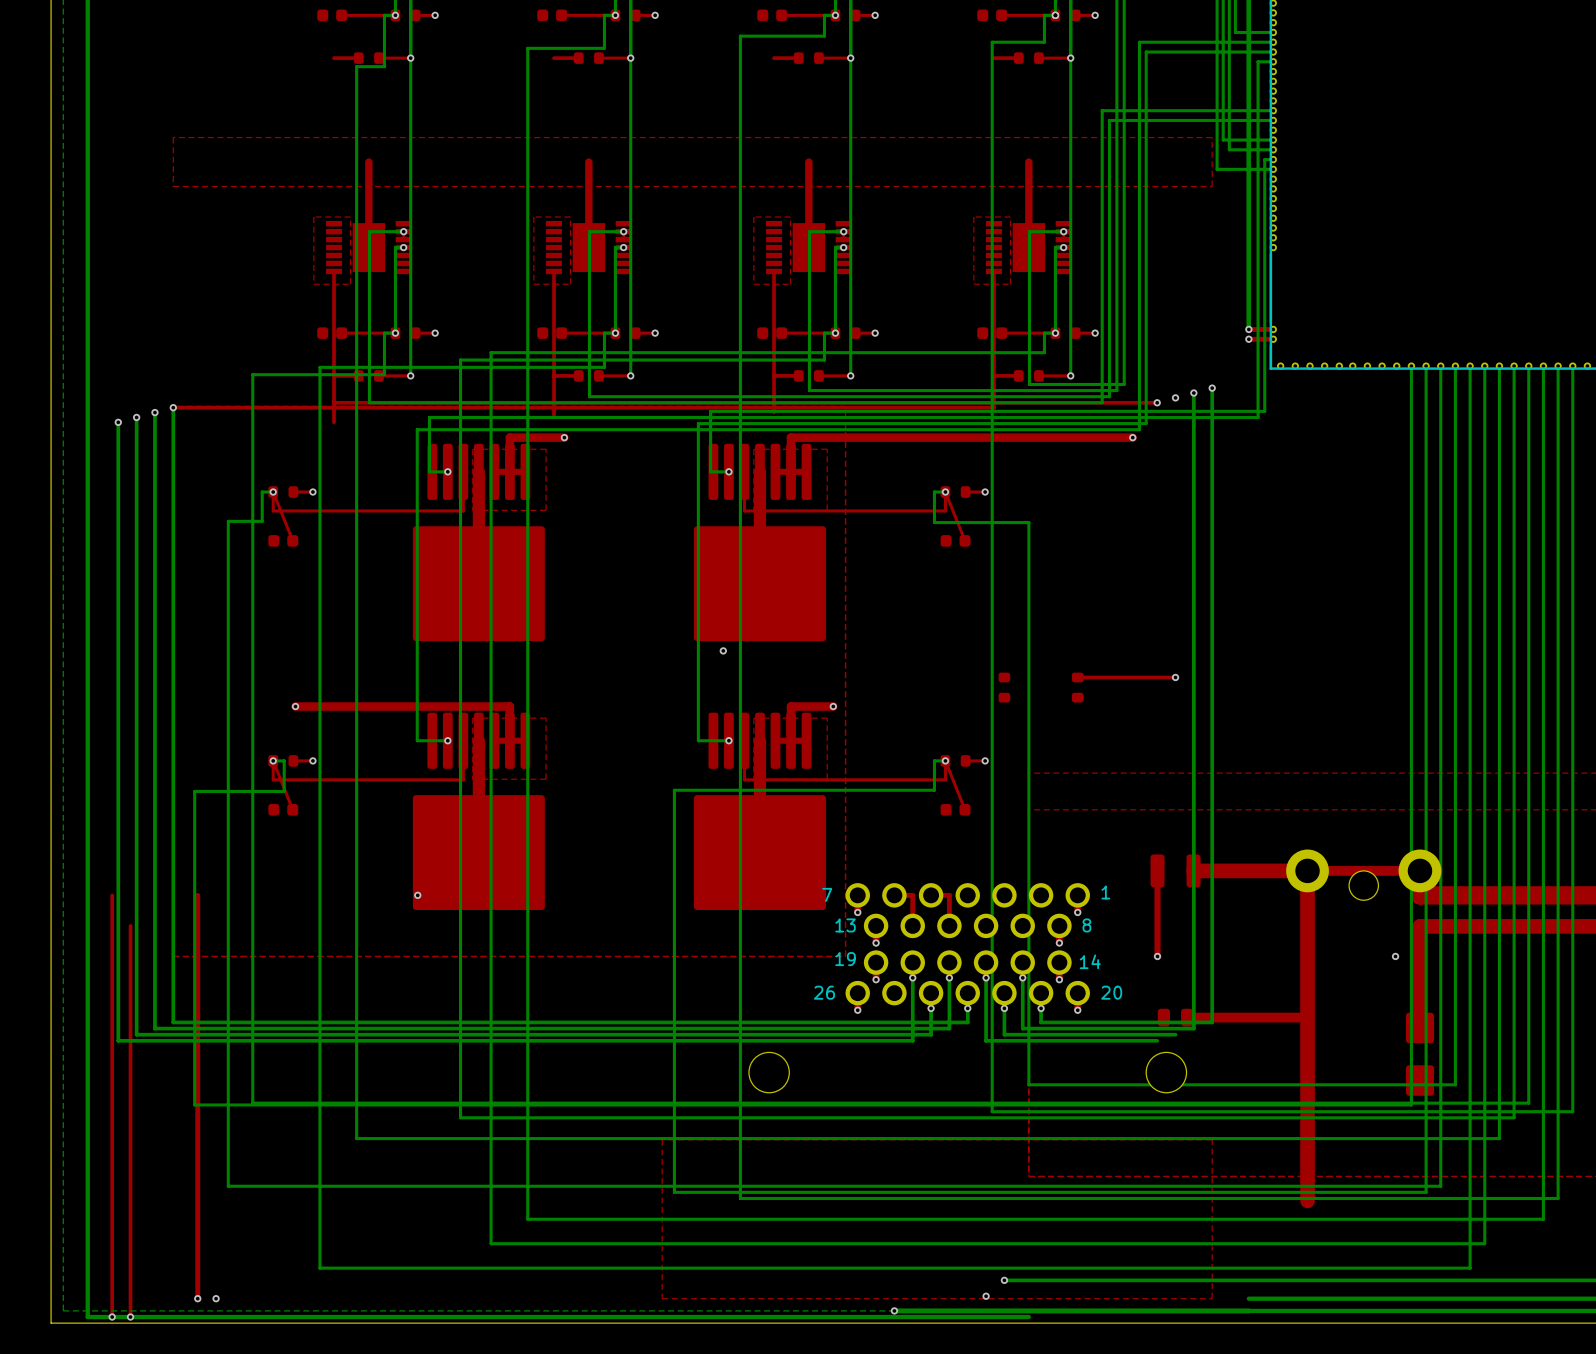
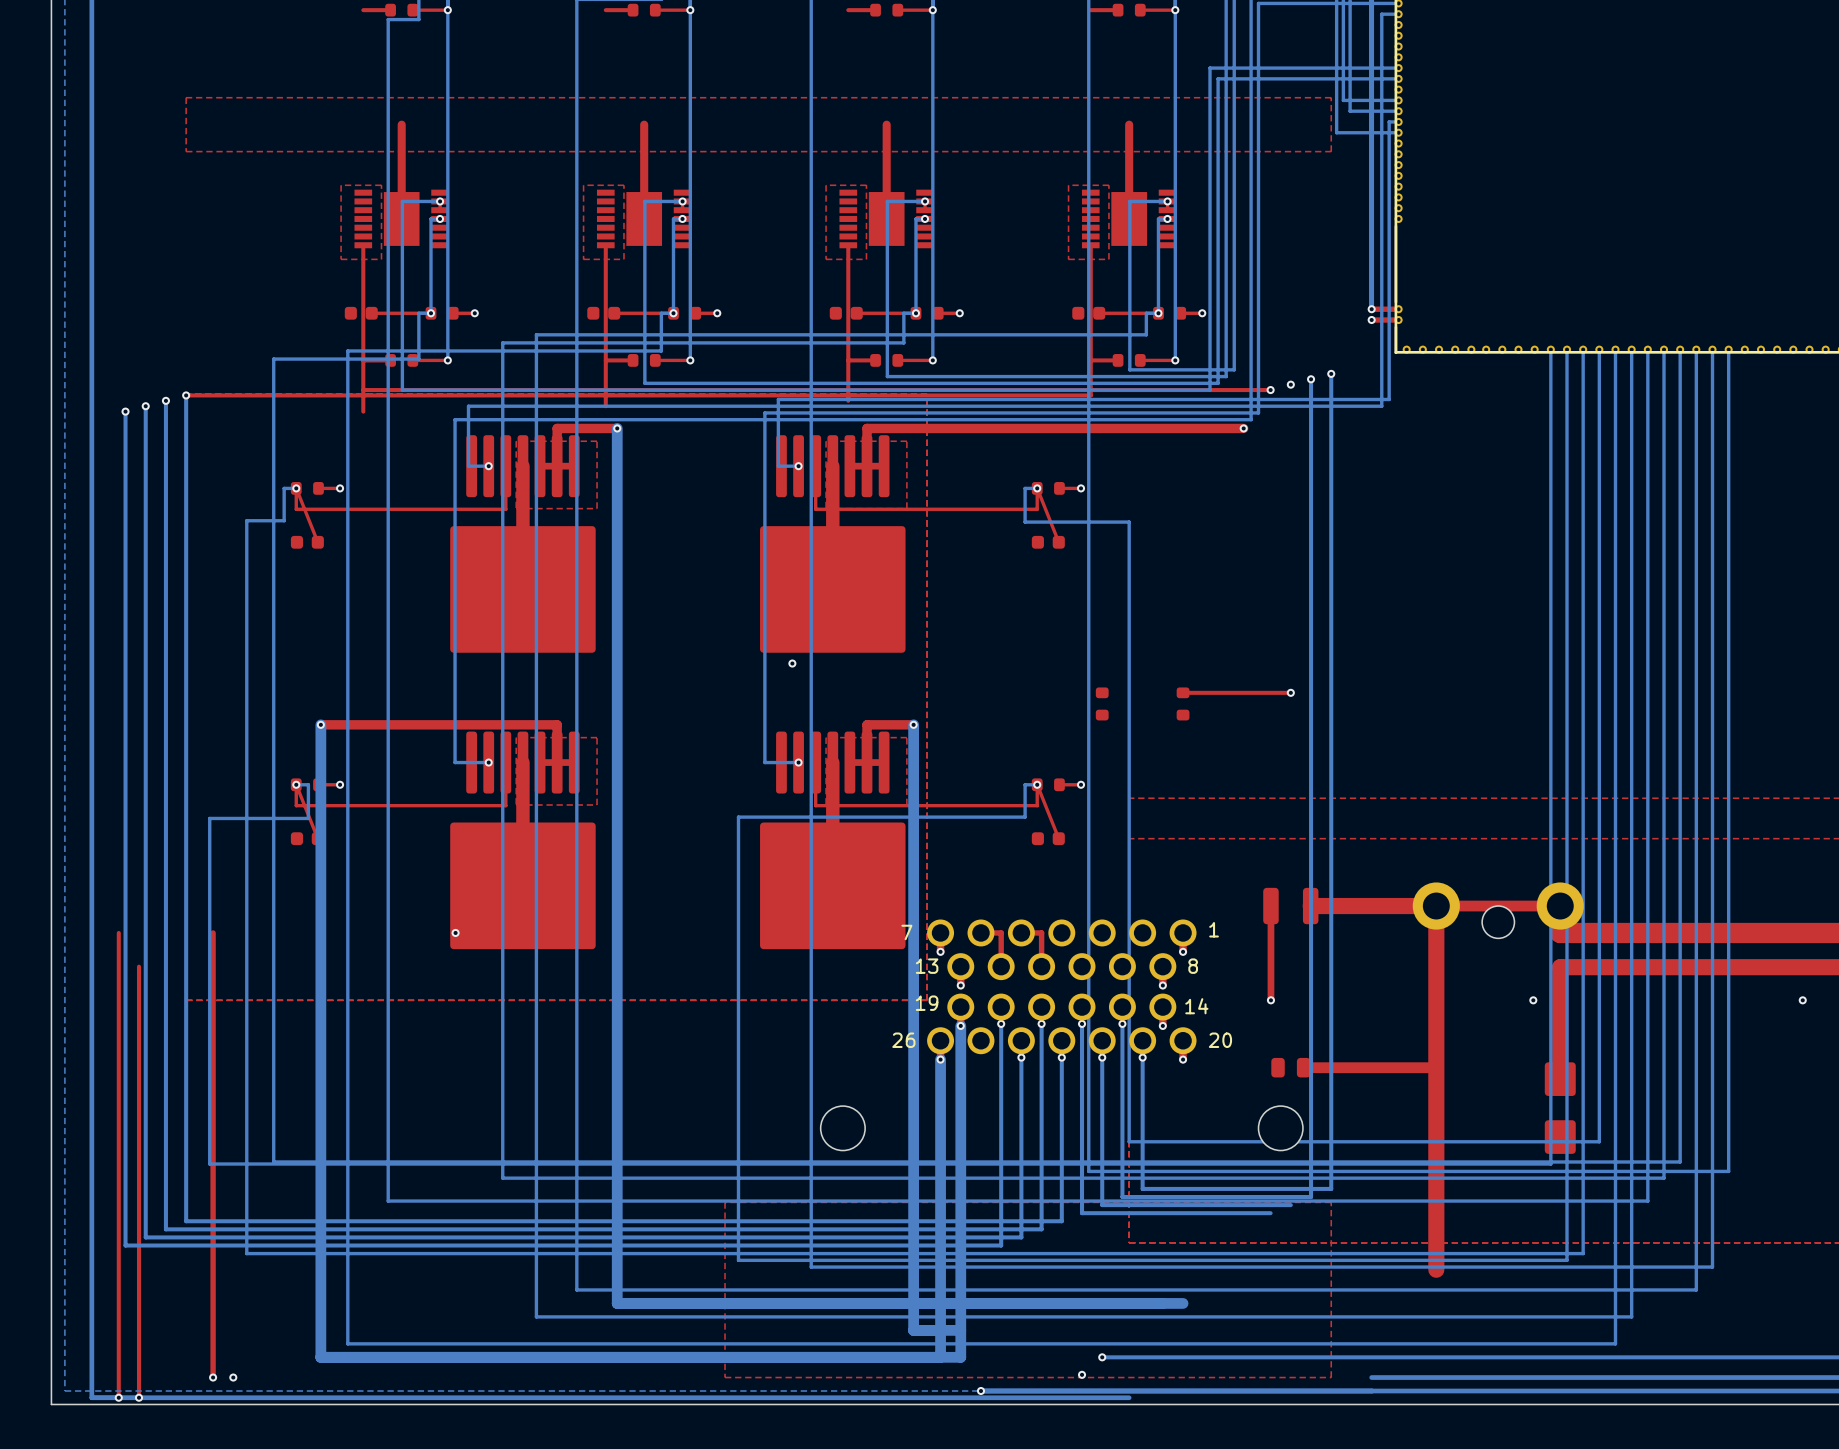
bottom track: none -> (617, 428) (617, 1303) (1183, 1303)
bottom track: none -> (320, 724) (320, 1357) (960, 1357) (960, 1025)
bottom track: none -> (913, 724) (913, 1330) (960, 1330)
bottom track: none -> (940, 1059) (940, 1357)
bottom track: (967, 1022) (173, 1022) -> (1061, 1073) (1061, 1221) (186, 1221) (186, 1073)
bottom track: (1212, 1022) (1041, 1022) -> (1331, 1073) (1331, 1188) (1142, 1188) (1142, 1073)
bottom track: (949, 1028) (154, 1028) -> (1041, 1079) (1041, 1229) (165, 1229) (165, 1079)
bottom track: (1193, 1028) (1022, 1028) -> (1311, 1079) (1311, 1197) (1122, 1197) (1122, 1079)
bottom track: (931, 1034) (136, 1034) -> (1021, 1086) (1021, 1237) (145, 1237) (145, 1086)
bottom track: (1175, 1034) (1004, 1034) -> (1290, 1205) (1102, 1205) (1102, 1086)
bottom track: (912, 1040) (118, 1040) -> (1001, 1093) (1001, 1245) (125, 1245) (125, 1093)
bottom track: (1157, 1040) (986, 1040) -> (1270, 1213) (1082, 1213) (1082, 1093)

